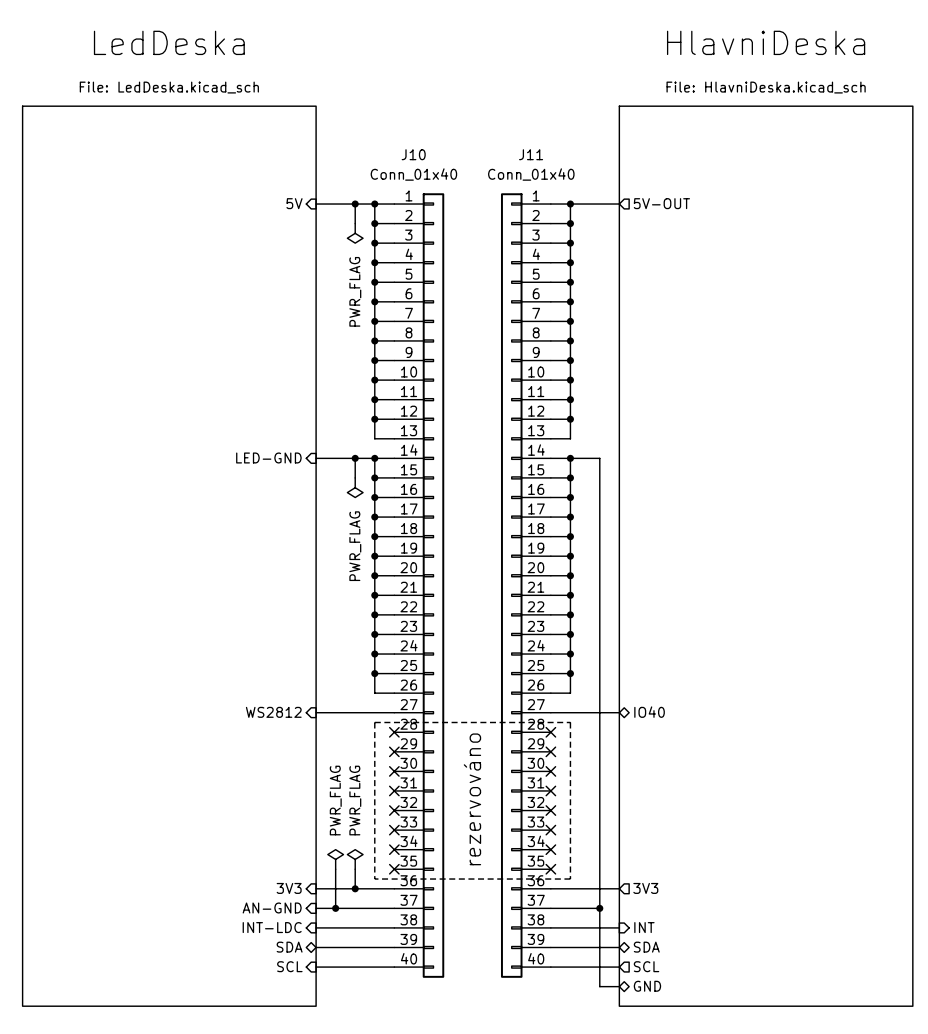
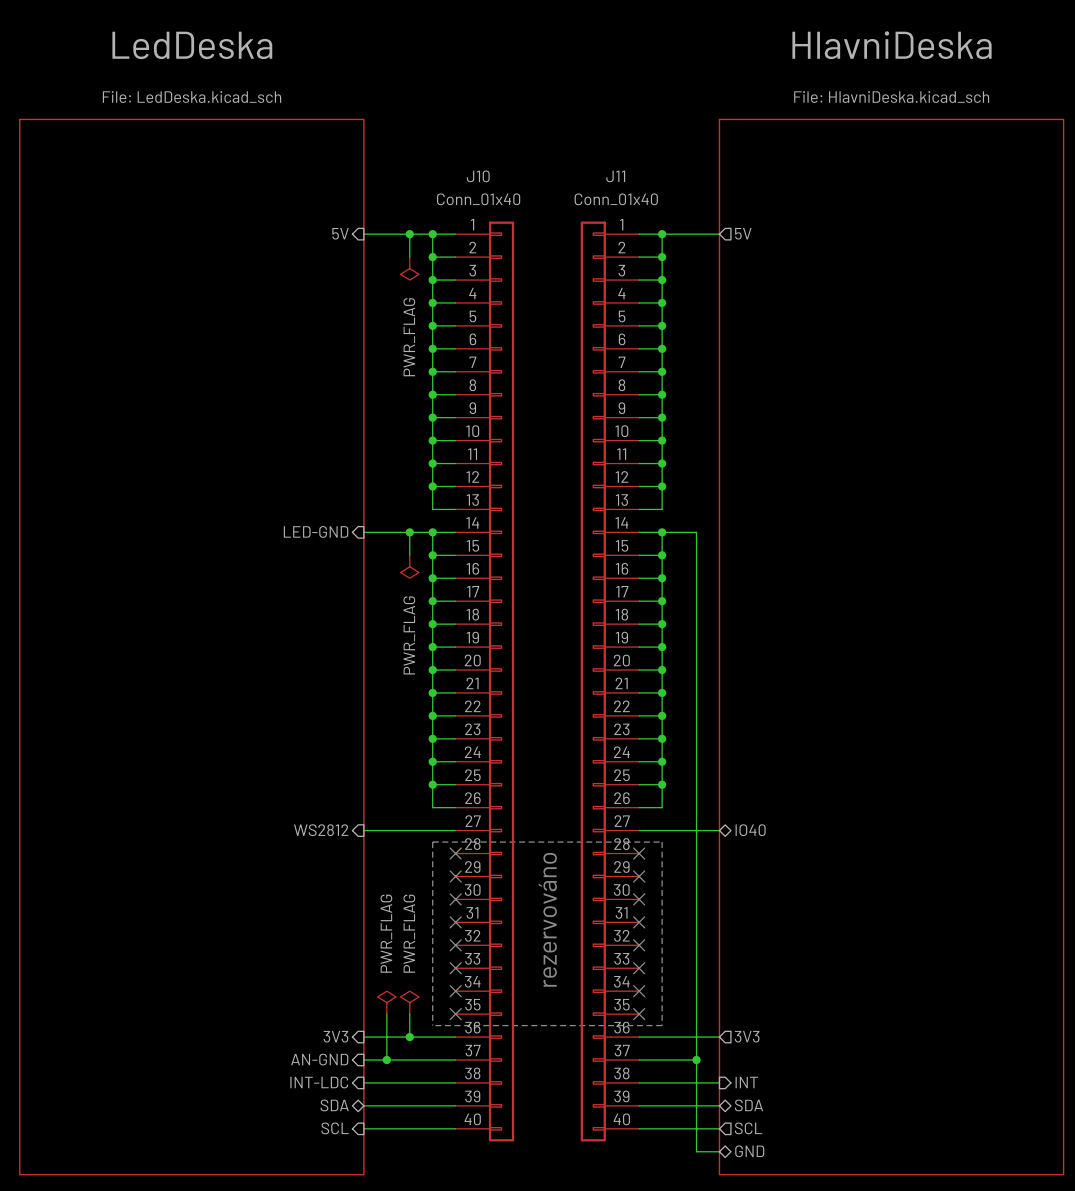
sheet pin: 5V-OUT (661, 203) -> 5V (743, 233)

